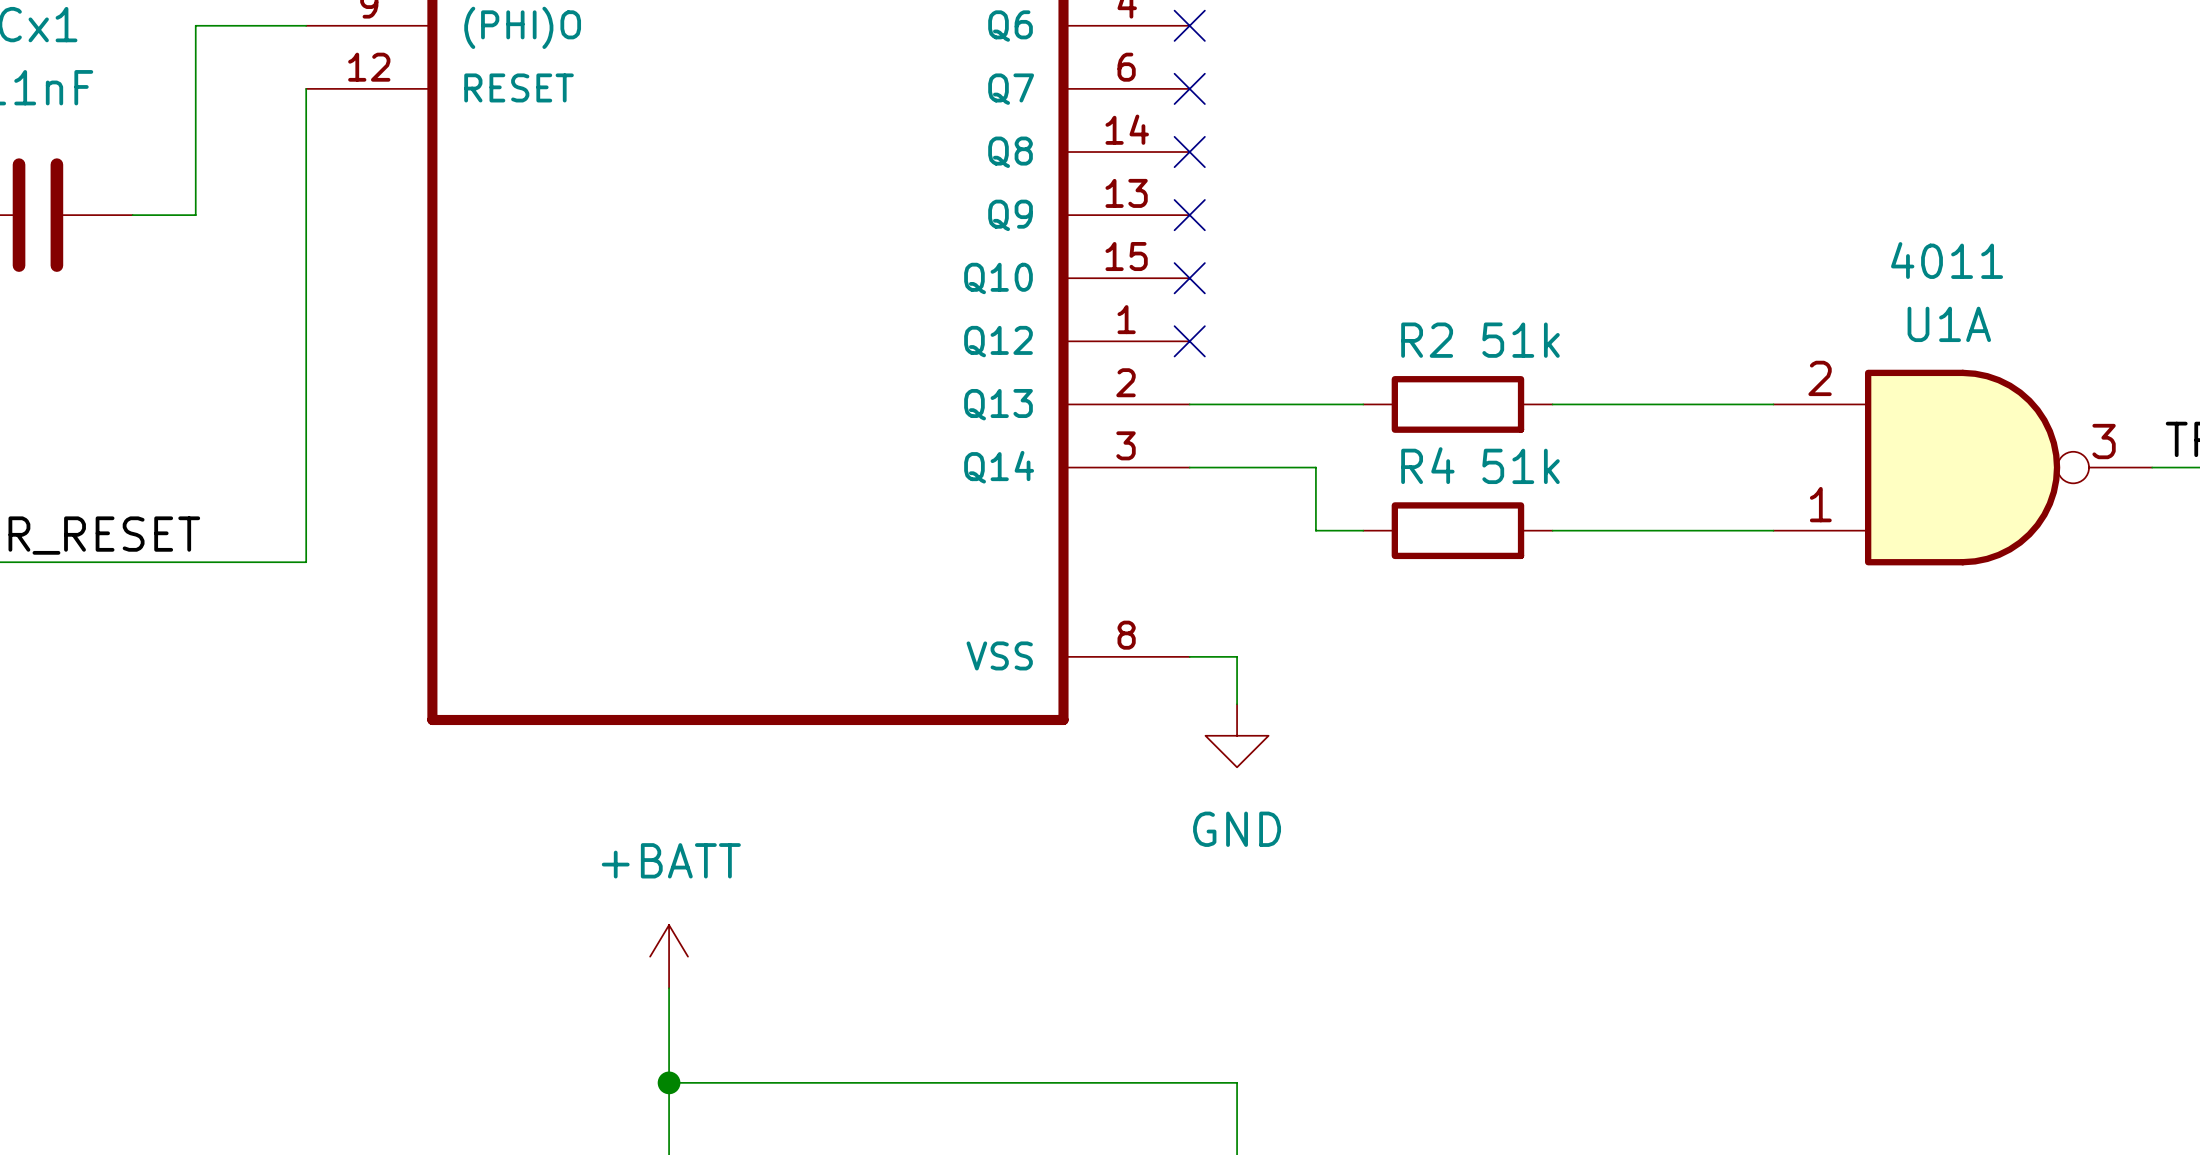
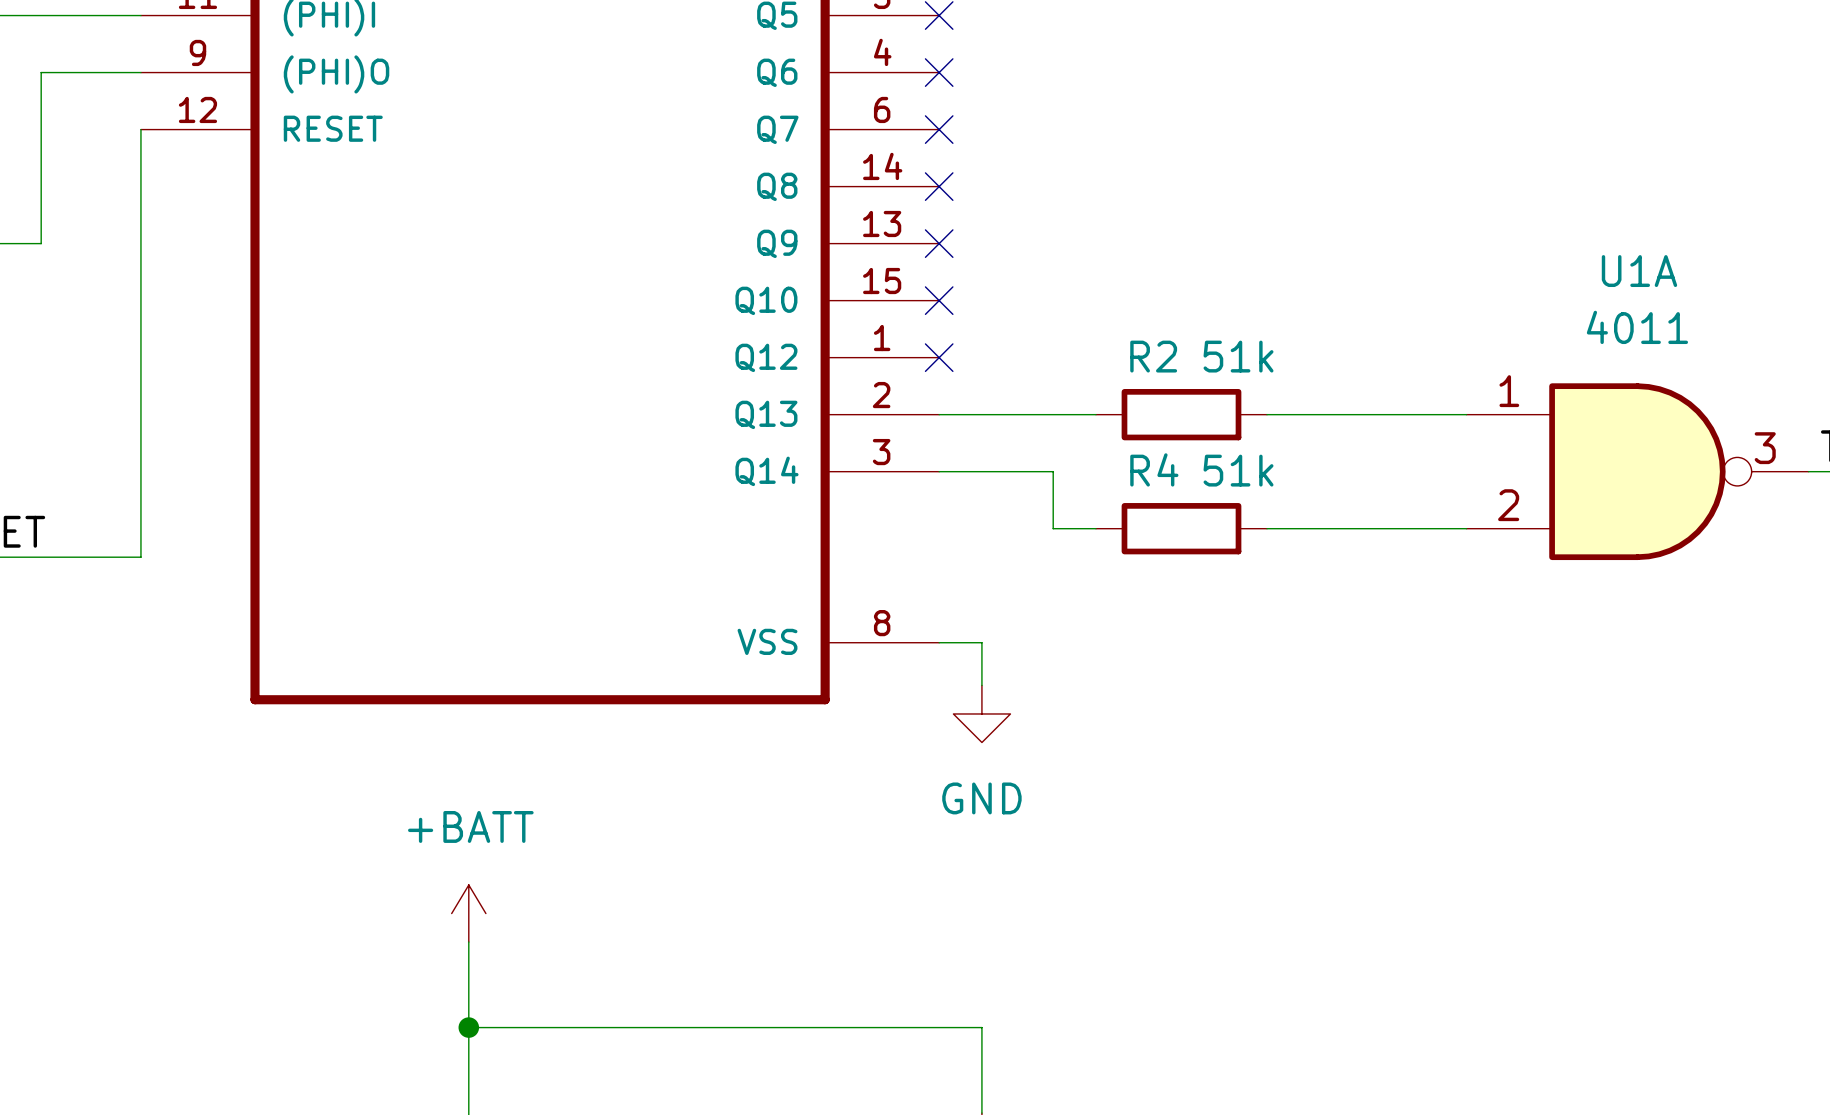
U1A value position: 4011 (1947, 260) -> 4011 (1637, 327)
U1A name position: U1A (1949, 324) -> U1A (1639, 271)
U1A flip: as is (1962, 467) -> up-down (1637, 471)

